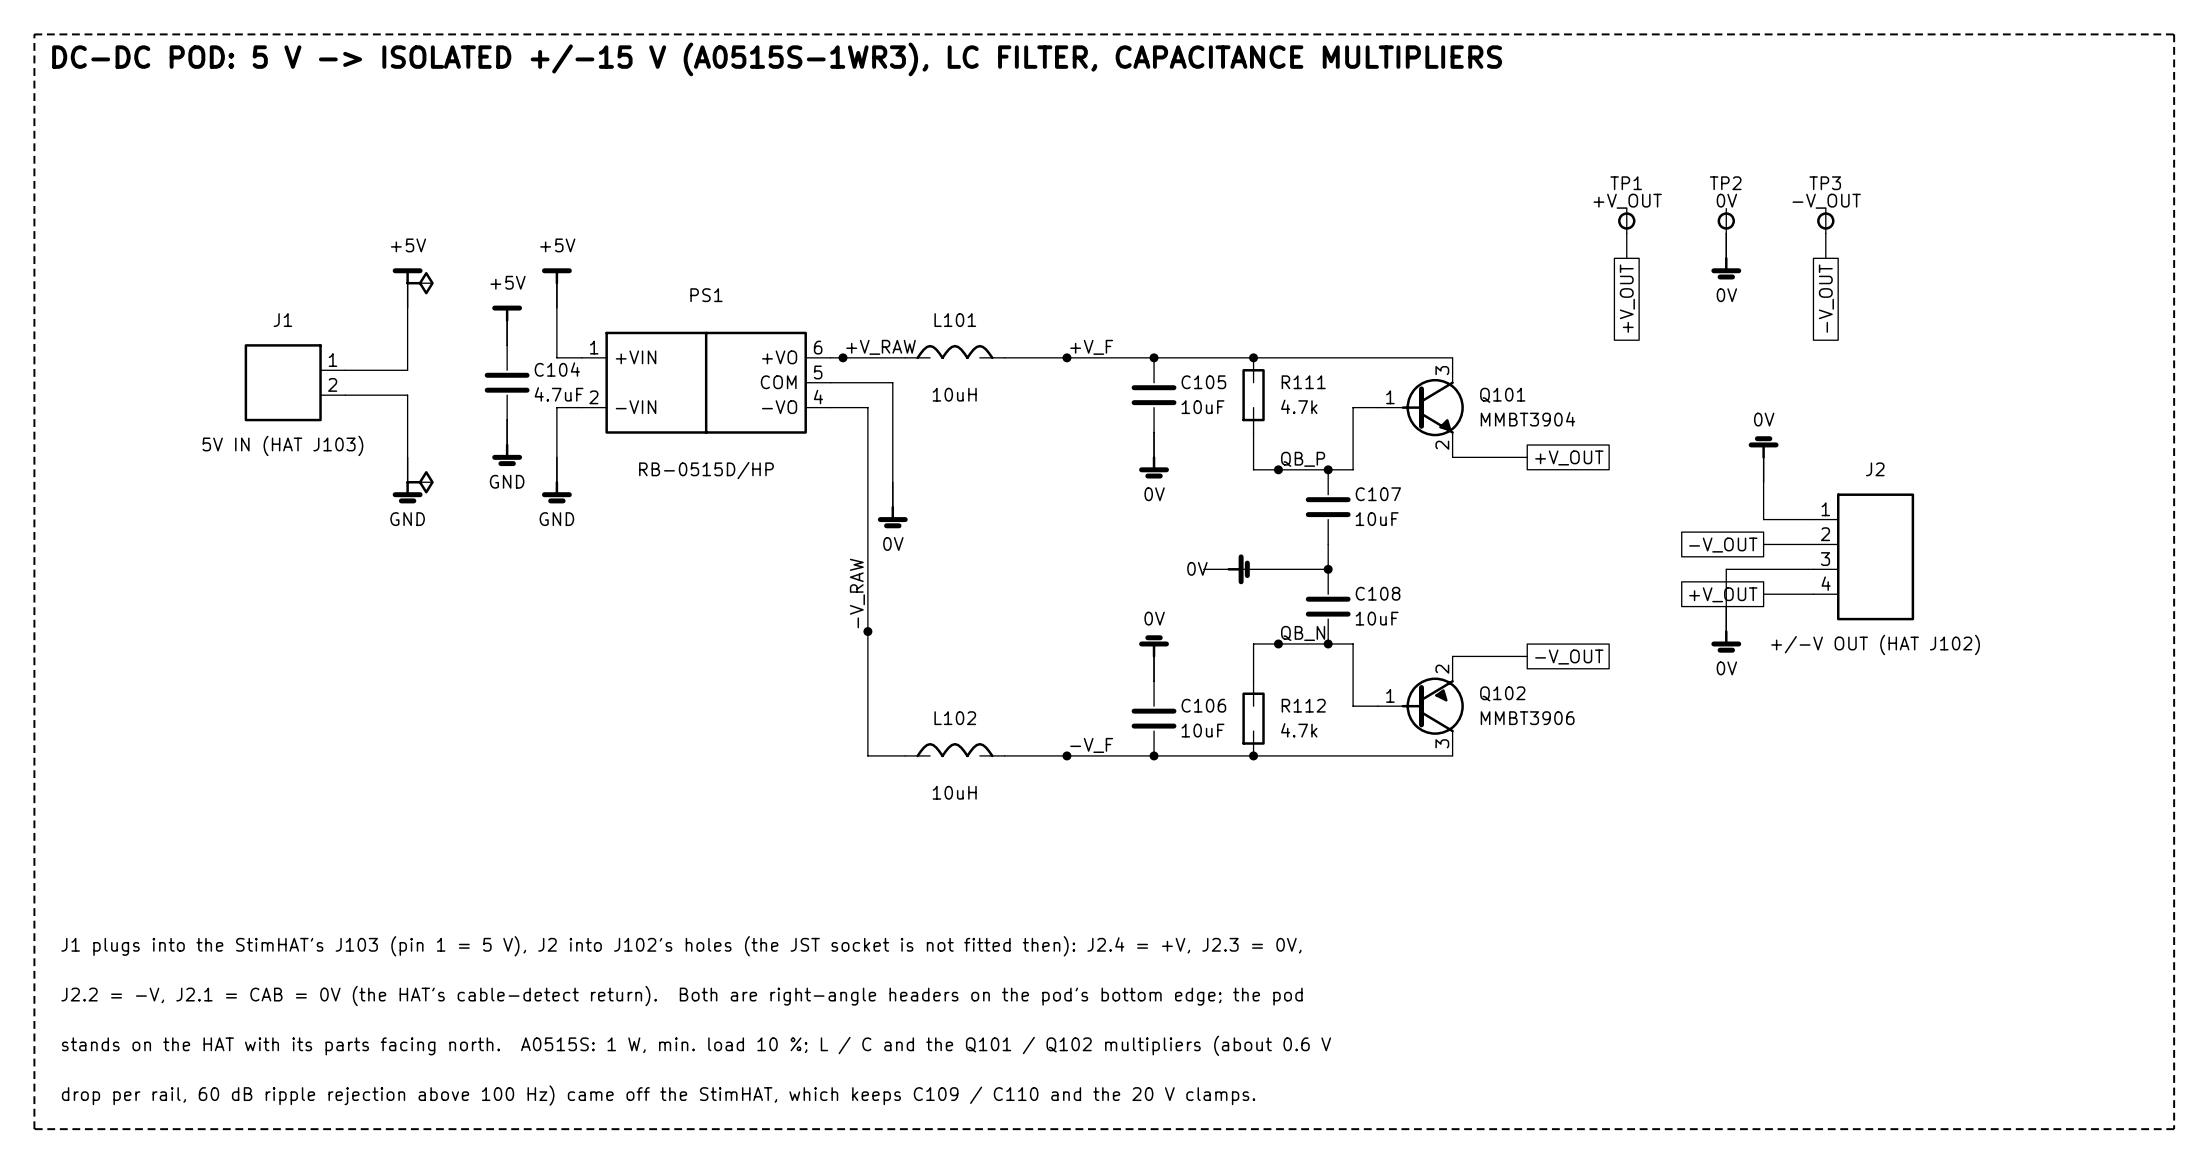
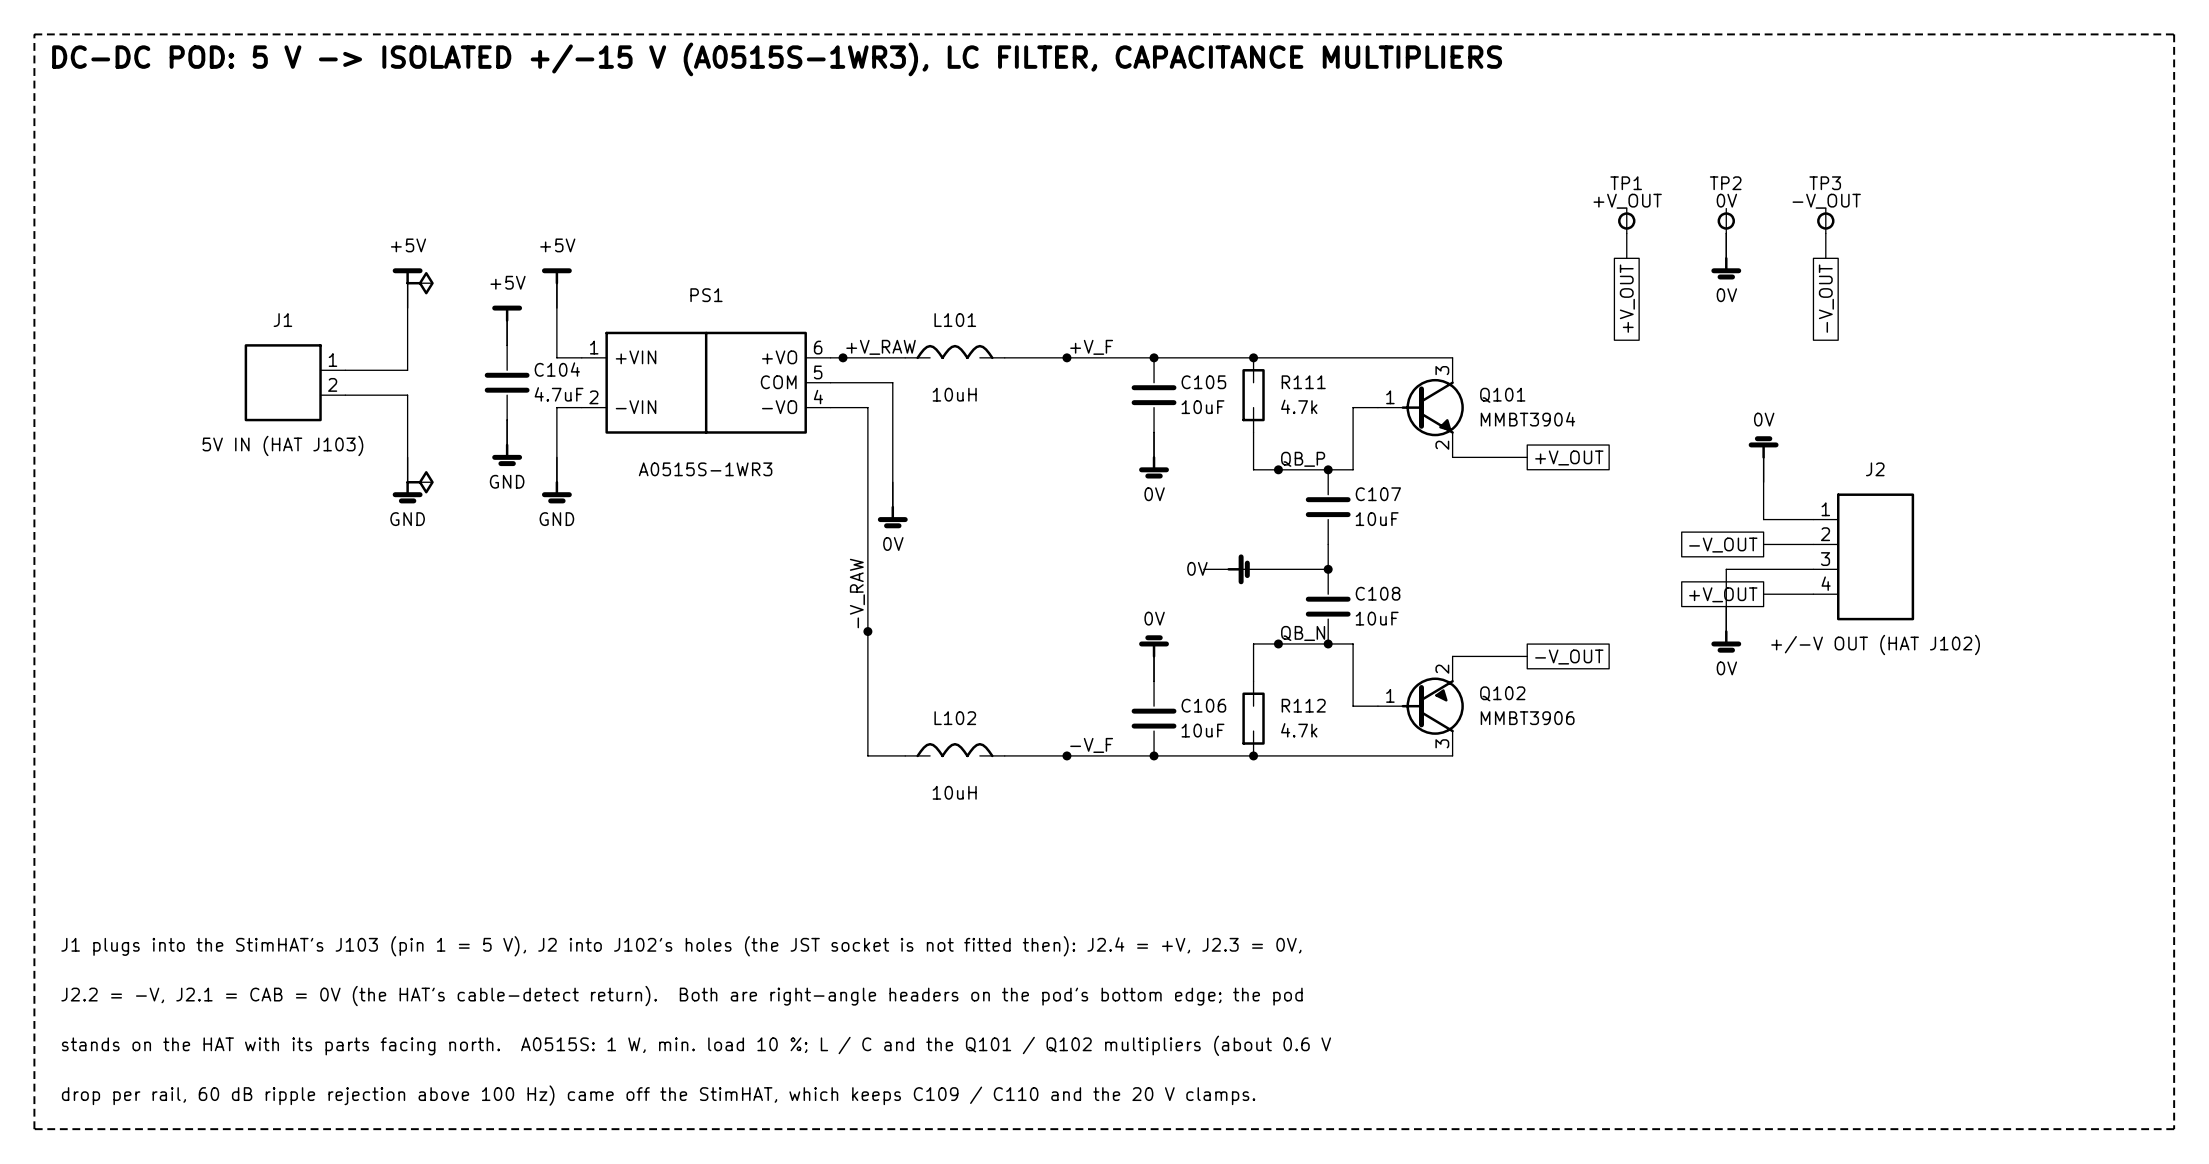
PS1 value: RB-0515D/HP (706, 470) -> A0515S-1WR3 (705, 469)

